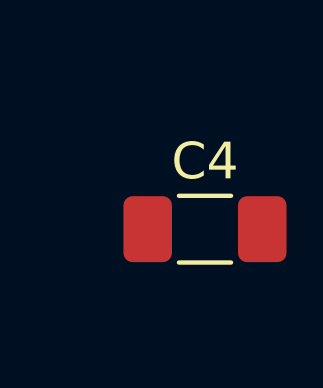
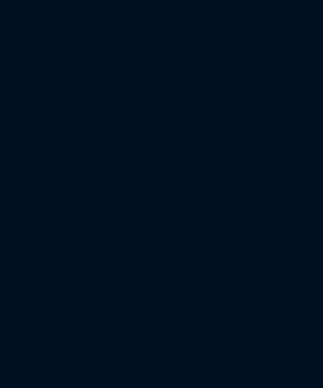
C4: (204, 229) -> none

